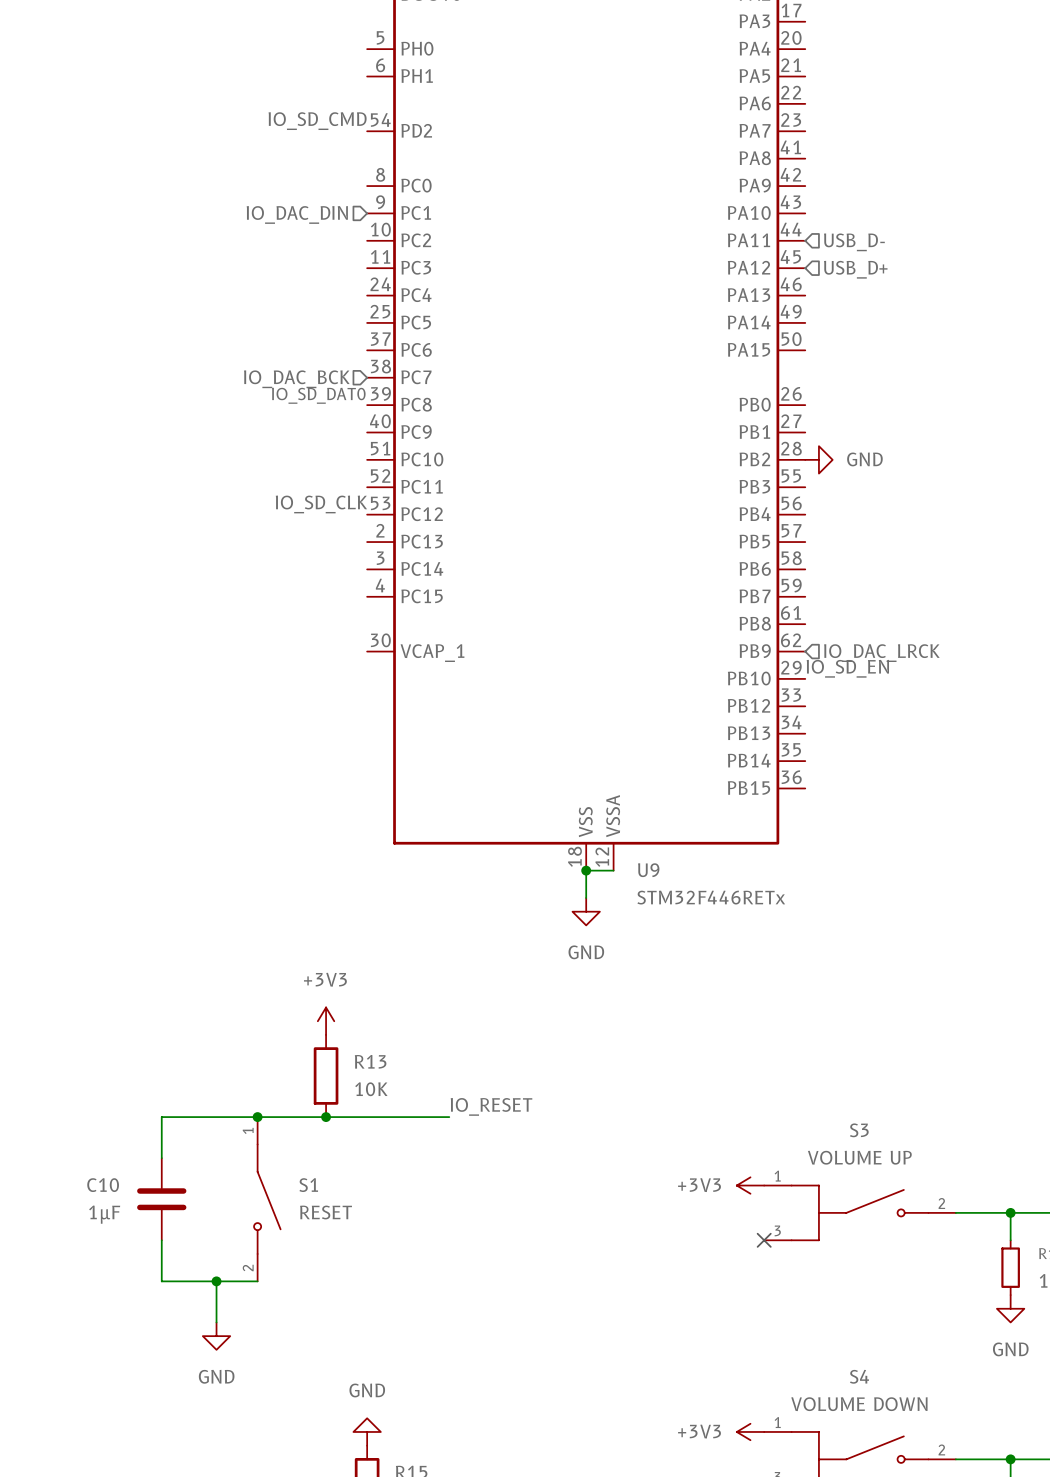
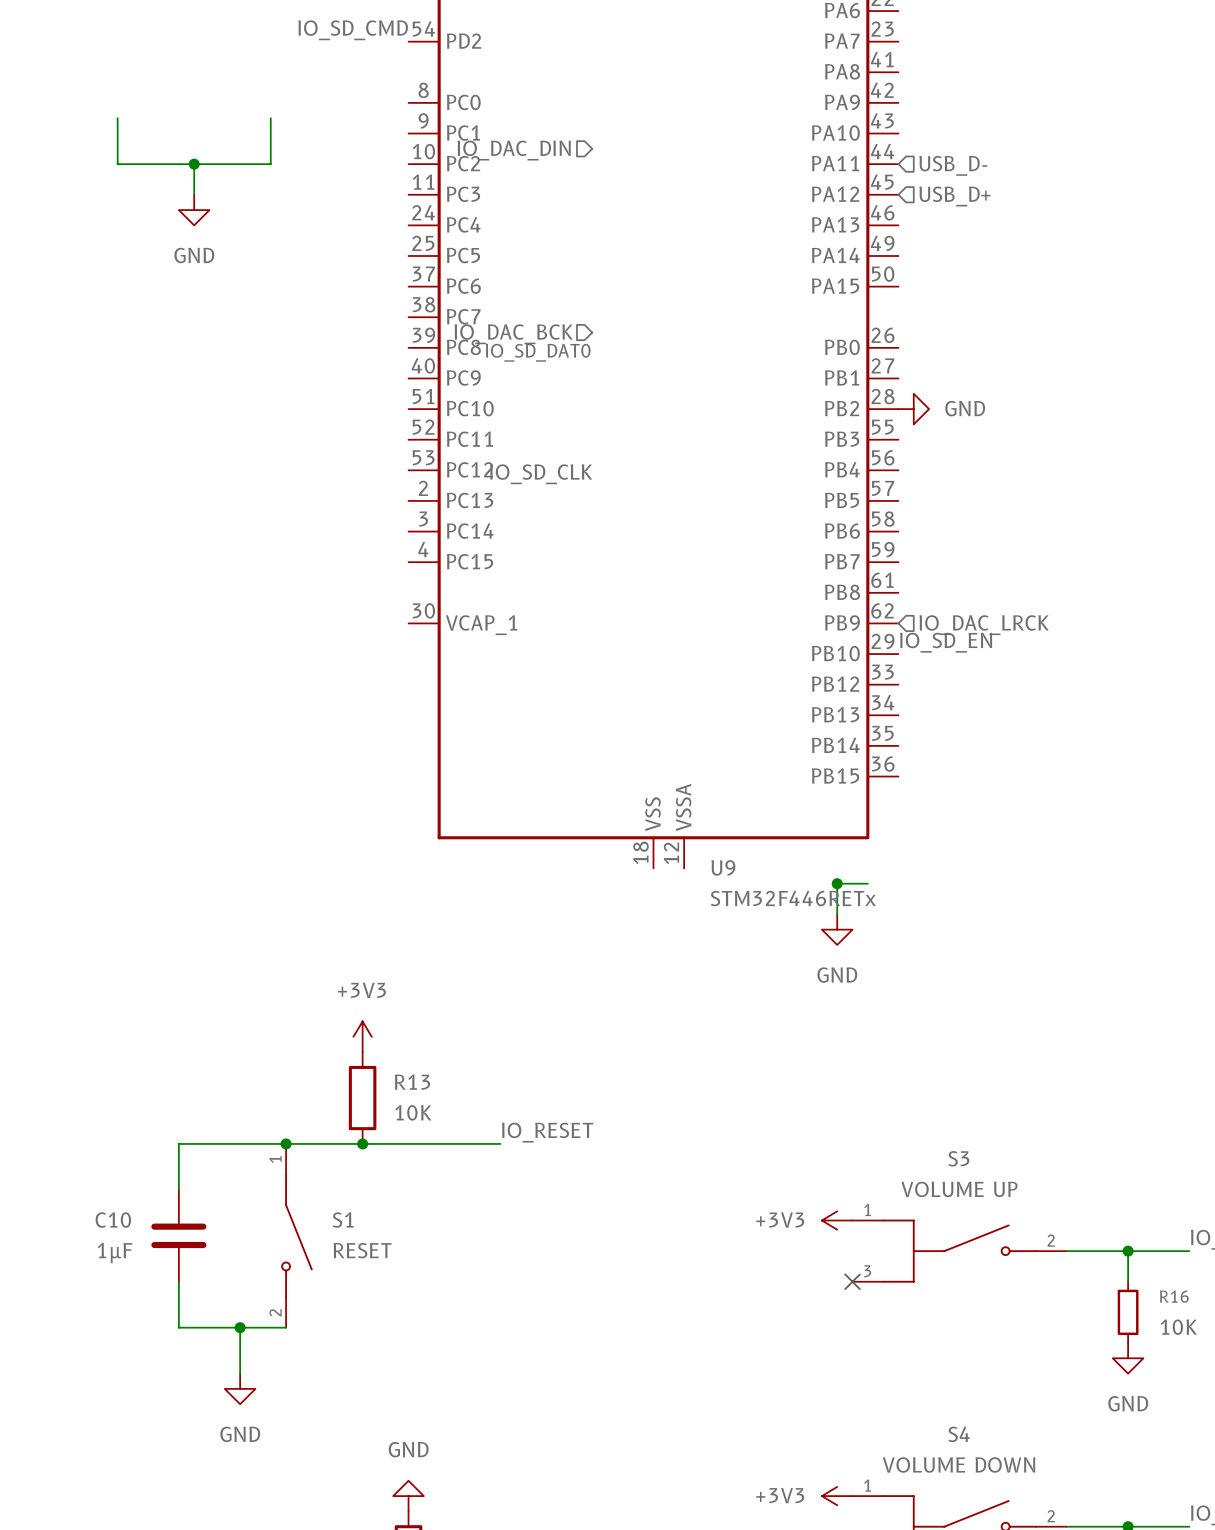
wire: none -> (117, 118) (117, 164) (270, 164) (270, 118)
hierarchical label position: IO_DAC_DIN (297, 214) -> IO_DAC_DIN (514, 150)
wire: none -> (194, 164) (194, 194)
junction: none -> (194, 164)
power symbol: none -> GND (194, 210)
hierarchical label position: IO_DAC_BCK (296, 379) -> IO_DAC_BCK (513, 334)
label position: IO_SD_DAT0 (318, 395) -> IO_SD_DAT0 (538, 352)
label position: IO_SD_CLK (321, 504) -> IO_SD_CLK (541, 474)
junction: (586, 870) -> none
wire: (613, 870) (586, 870) (586, 898) -> (867, 883) (837, 883) (837, 914)
junction: none -> (837, 883)
power symbol position: GND (586, 911) -> GND (837, 929)

